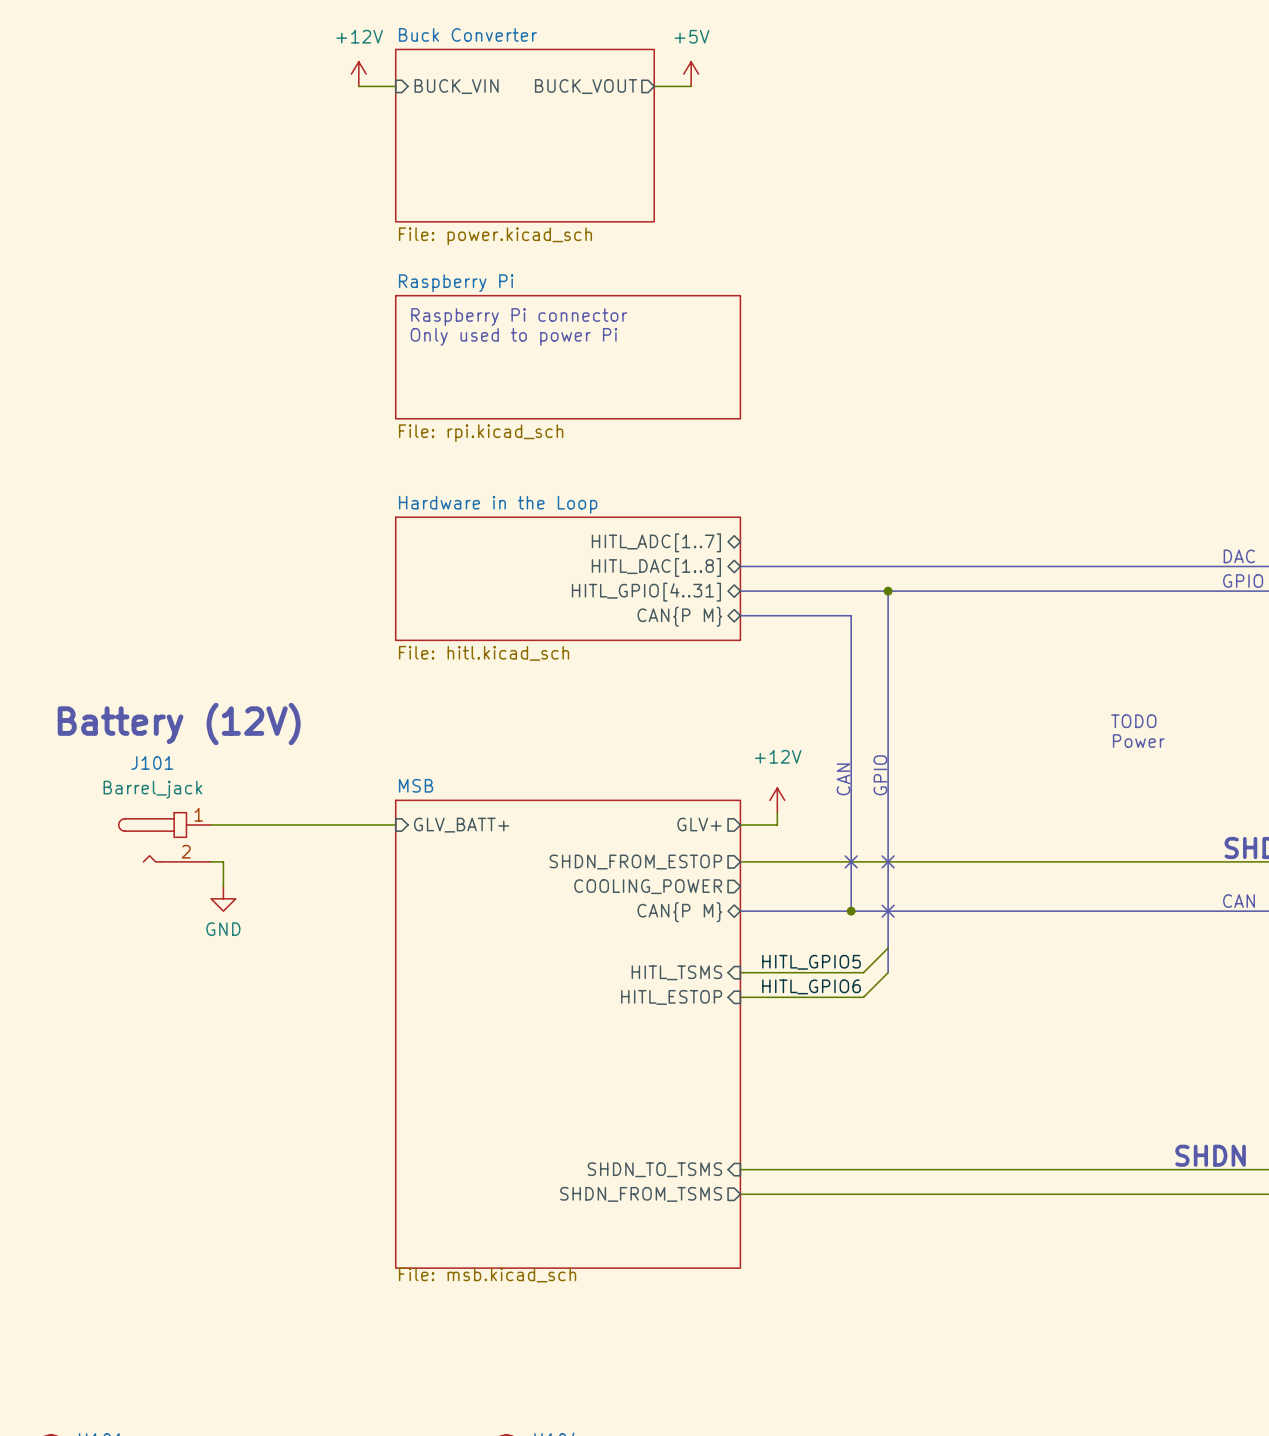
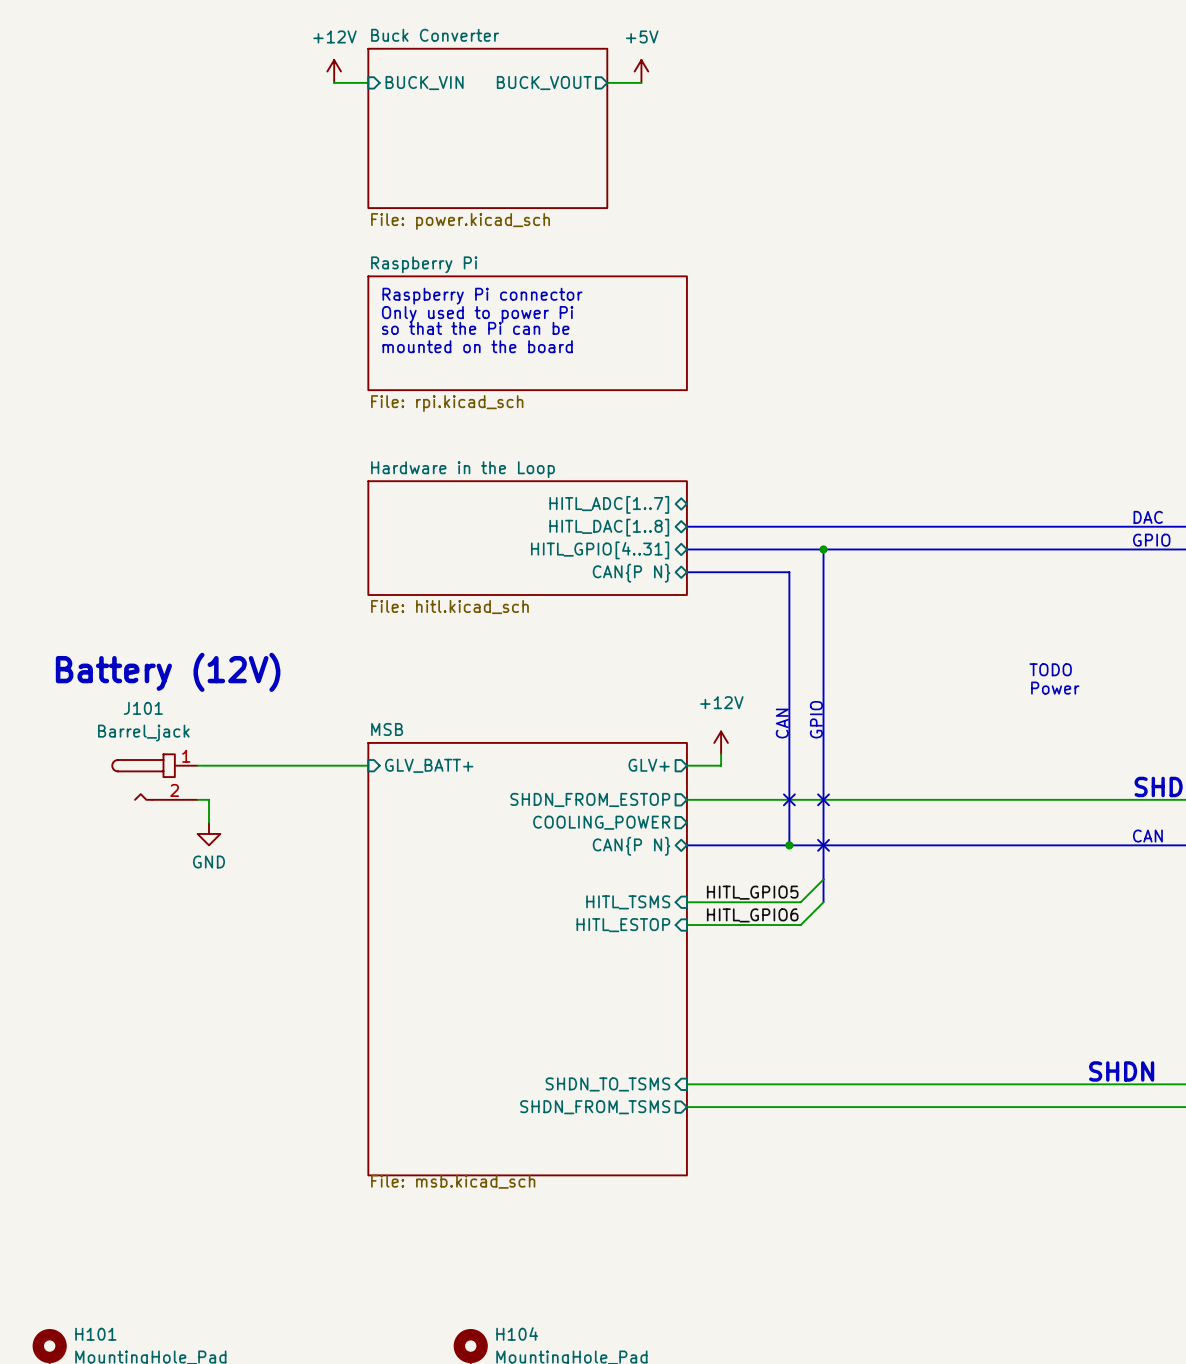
text: none -> so that the Pi can be (475, 328)
text: none -> mounted on the board (477, 346)
sheet pin: CAN{P M} (679, 616) -> CAN{P N} (631, 573)
sheet pin: CAN{P M} (679, 912) -> CAN{P N} (631, 846)

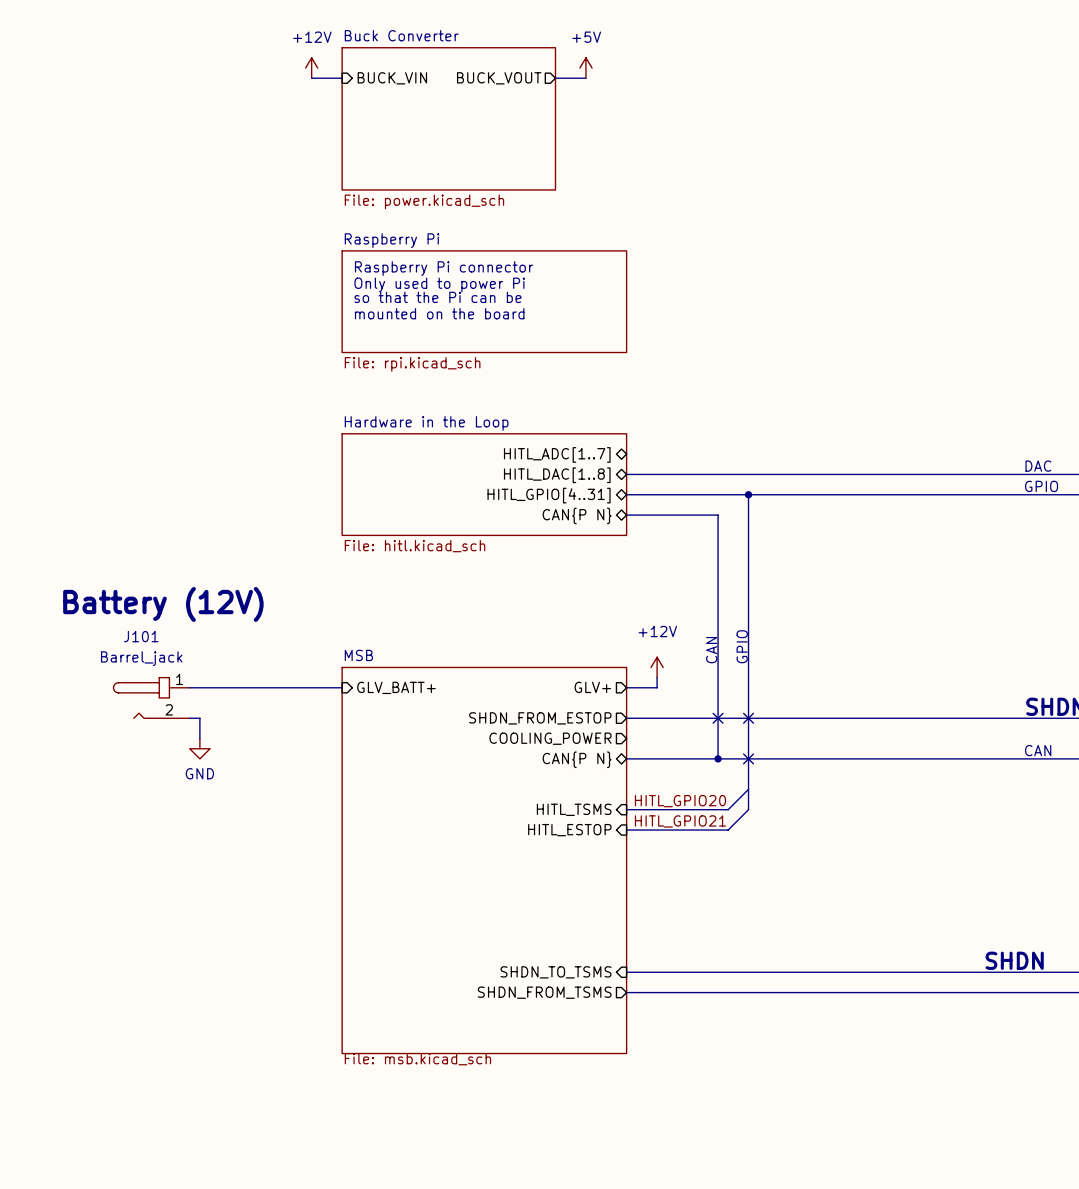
text: TODO (1050, 669) -> none
text: Power (1055, 688) -> none
label: HITL_GPIO5 (752, 892) -> HITL_GPIO20 (680, 801)
label: HITL_GPIO6 (752, 915) -> HITL_GPIO21 (680, 821)

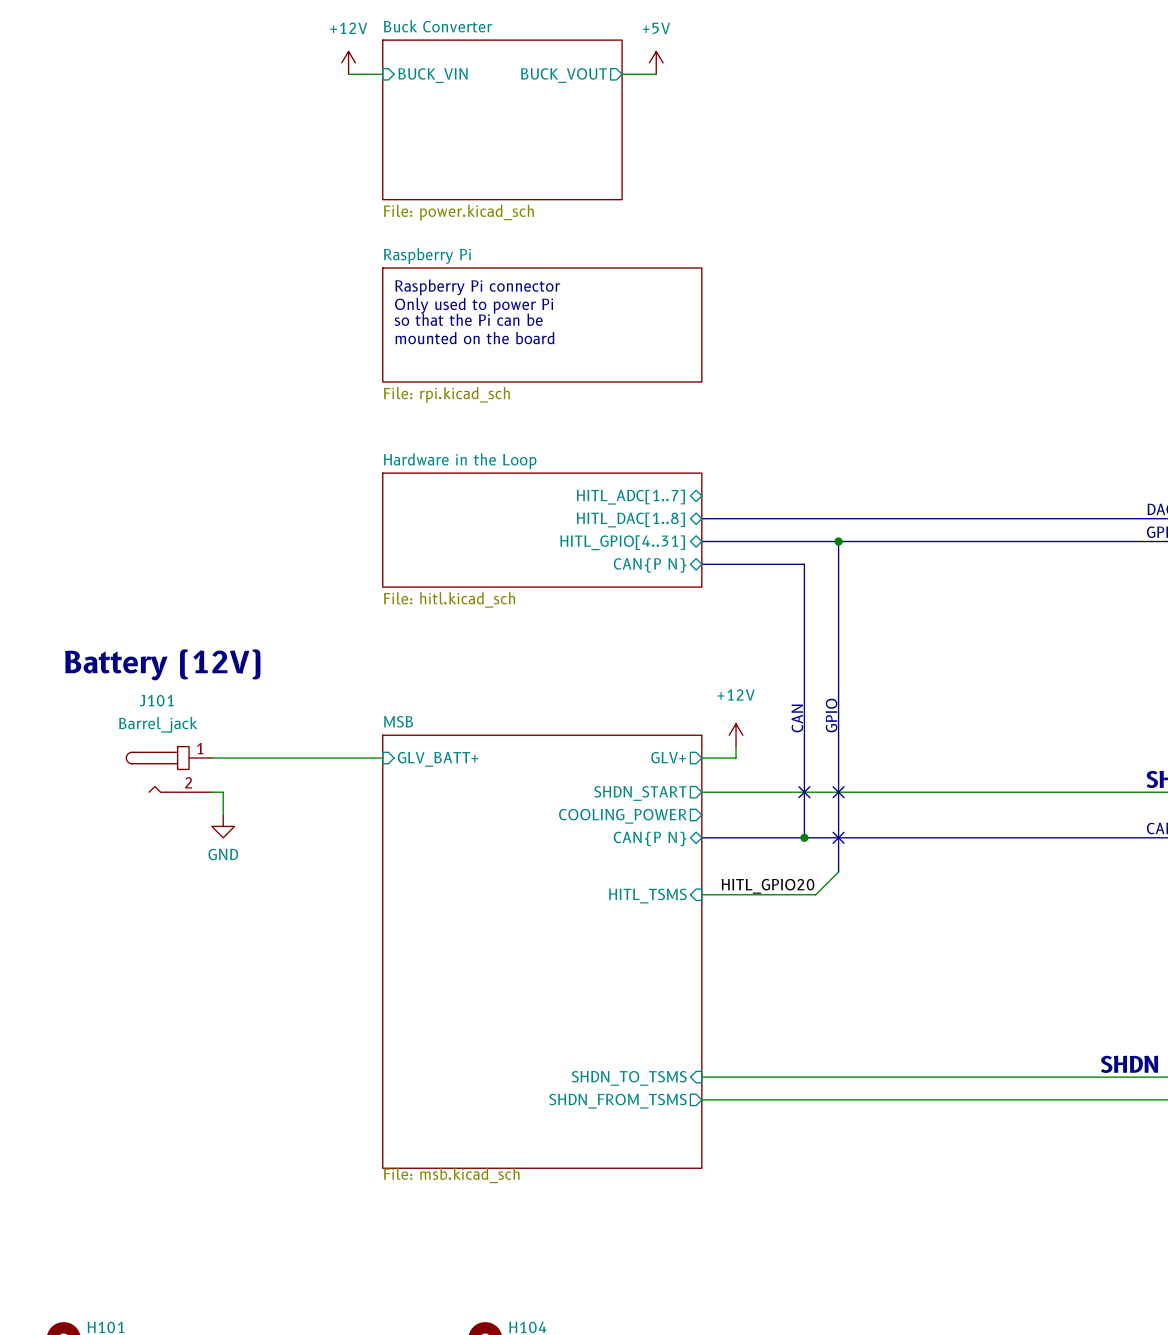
sheet pin: SHDN_FROM_ESTOP (540, 718) -> SHDN_START (640, 793)
bus: (748, 789) (748, 809) -> none
wire: (748, 809) (728, 830) (626, 830) -> none
label: HITL_GPIO21 (680, 821) -> none
sheet pin: HITL_ESTOP (569, 830) -> none

